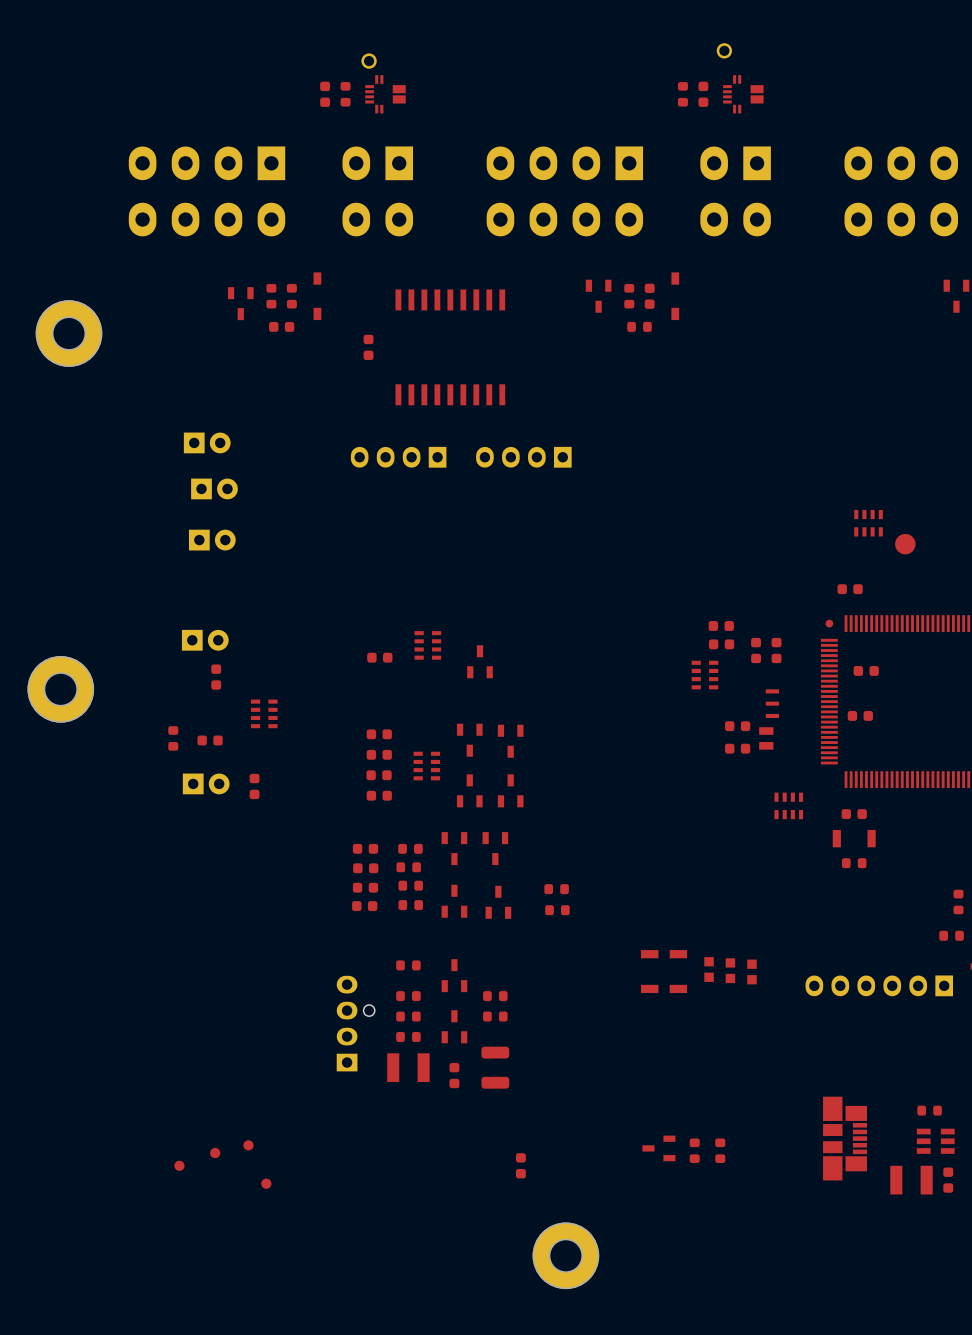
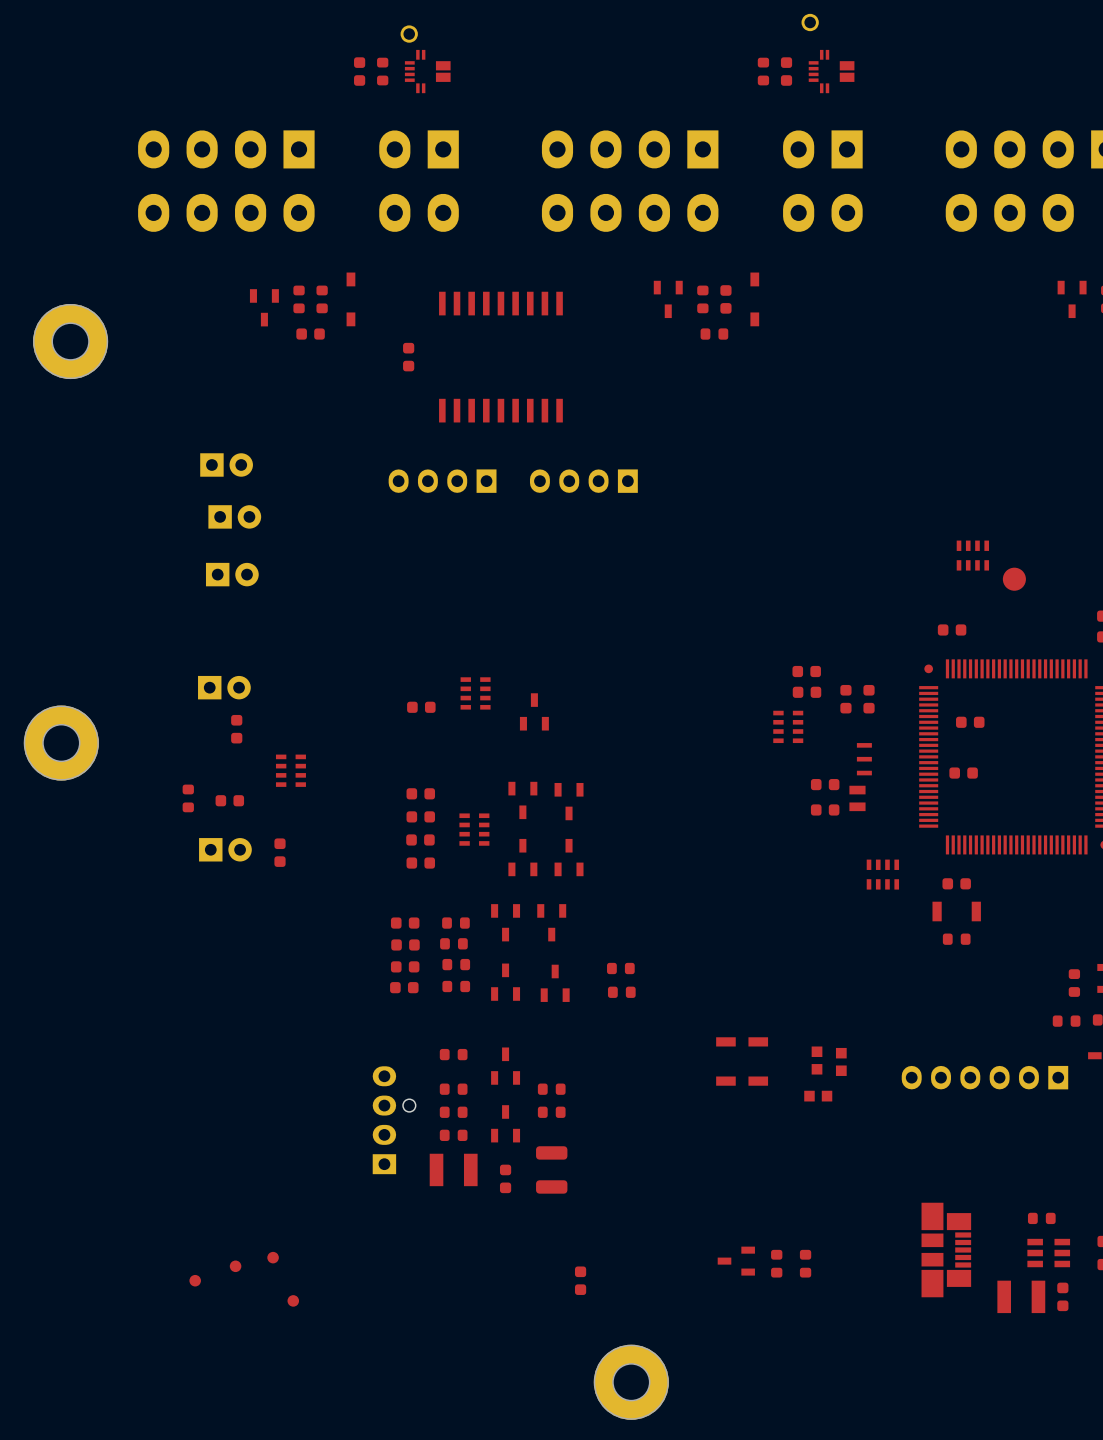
part rotation: 0° (709, 969) -> 90° clockwise (818, 1096)
part position: (709, 969) -> (818, 1096)

